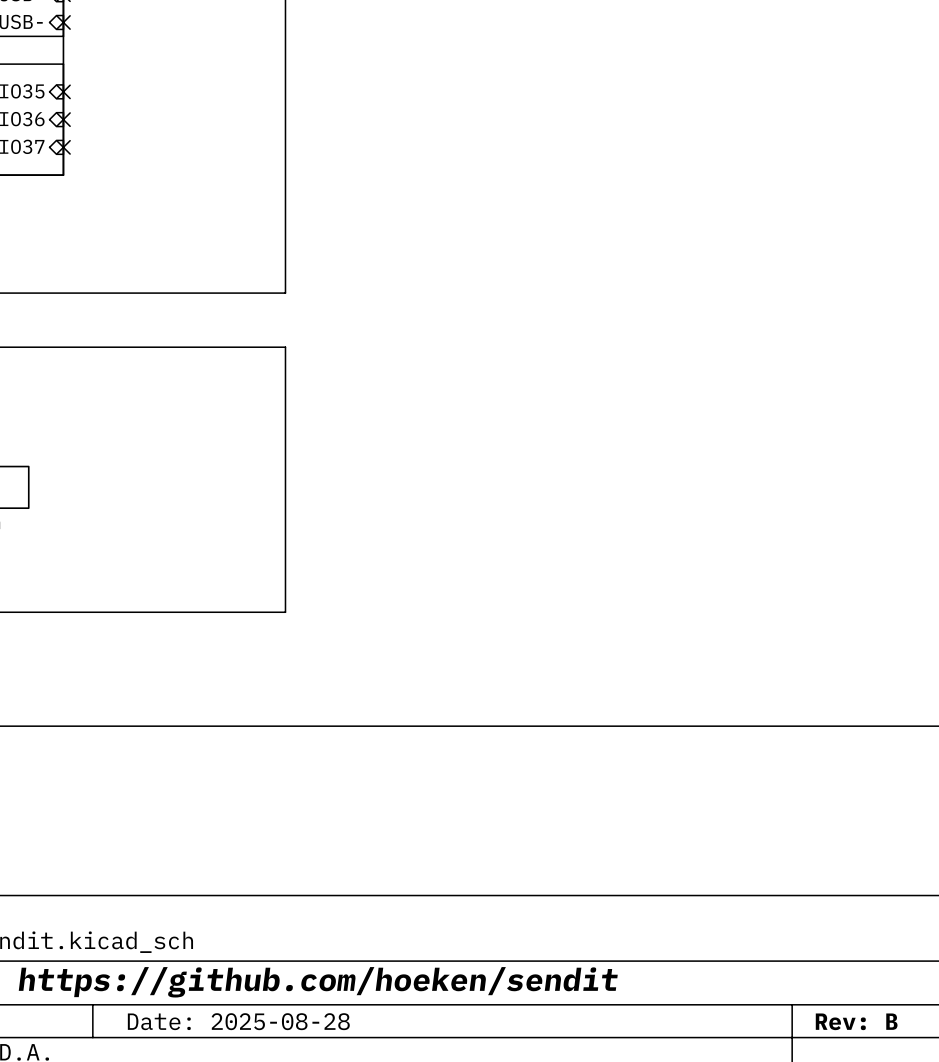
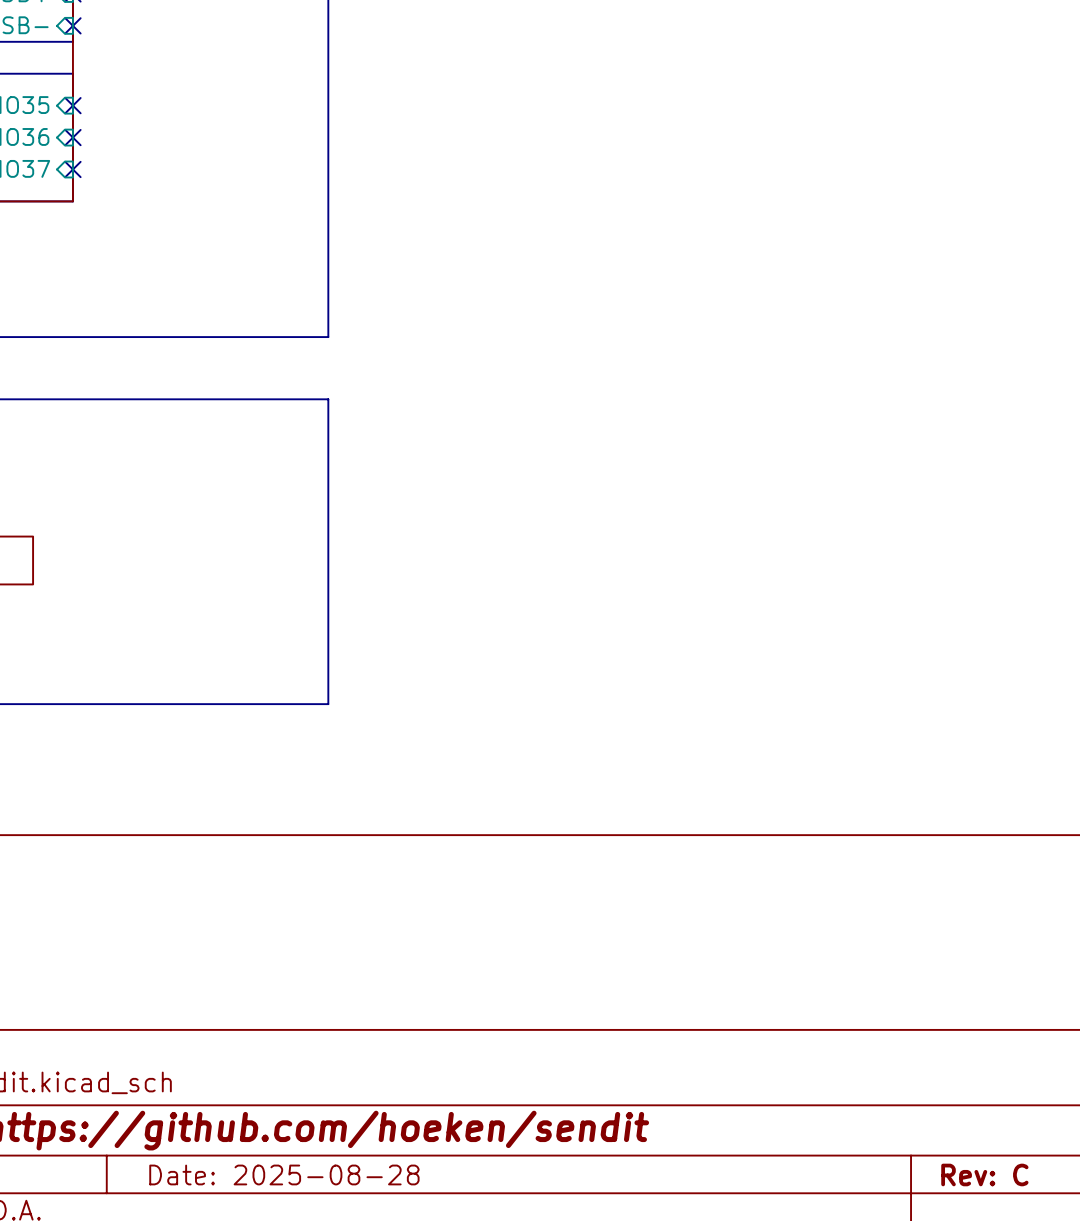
title block: Rev: B (856, 1021) -> Rev: C (984, 1174)

